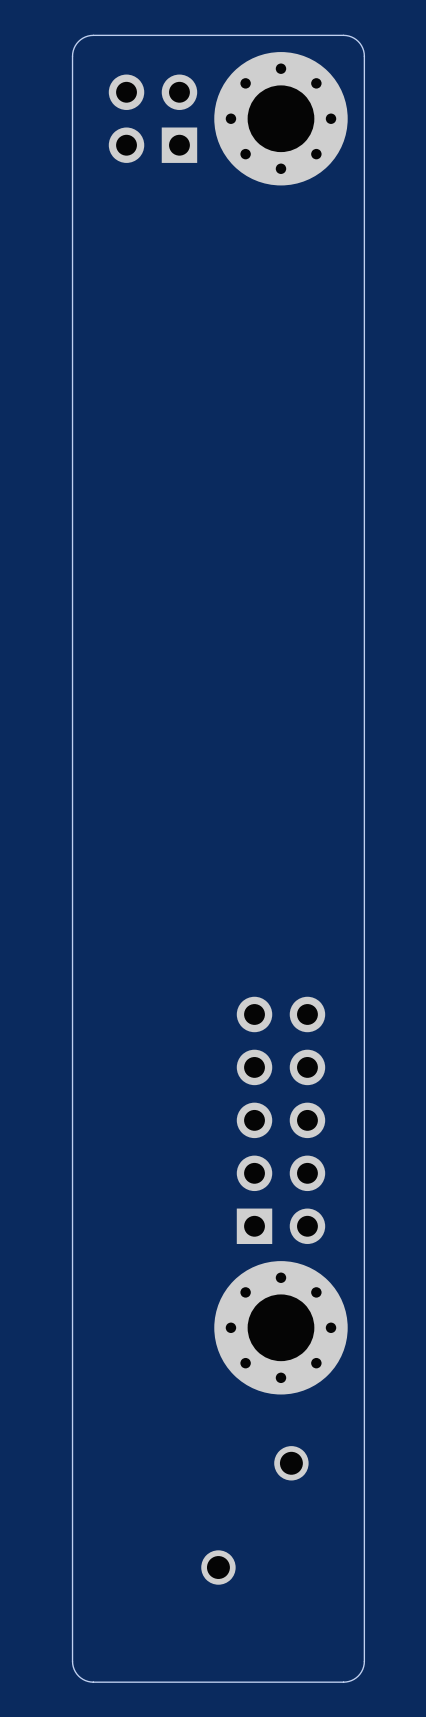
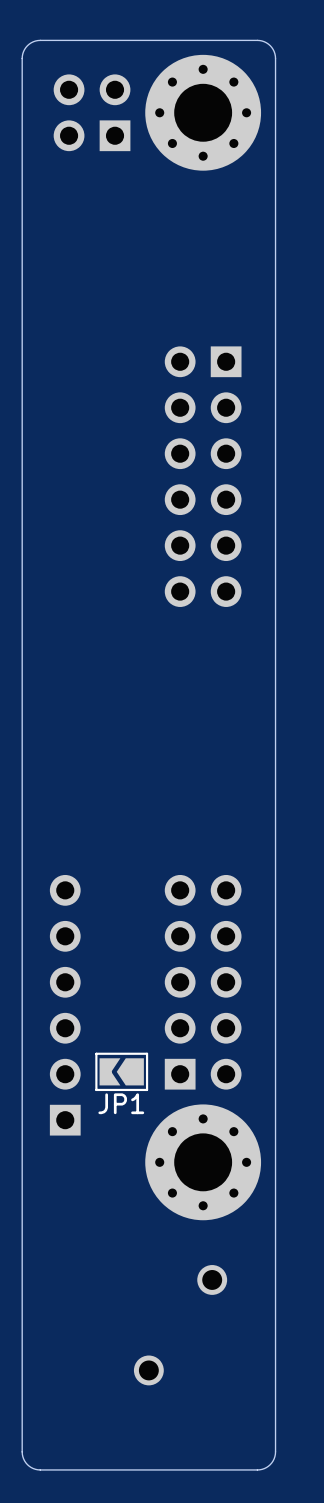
part: none -> (203, 476)
part: none -> (65, 1005)
JP1: none -> (121, 1071)

